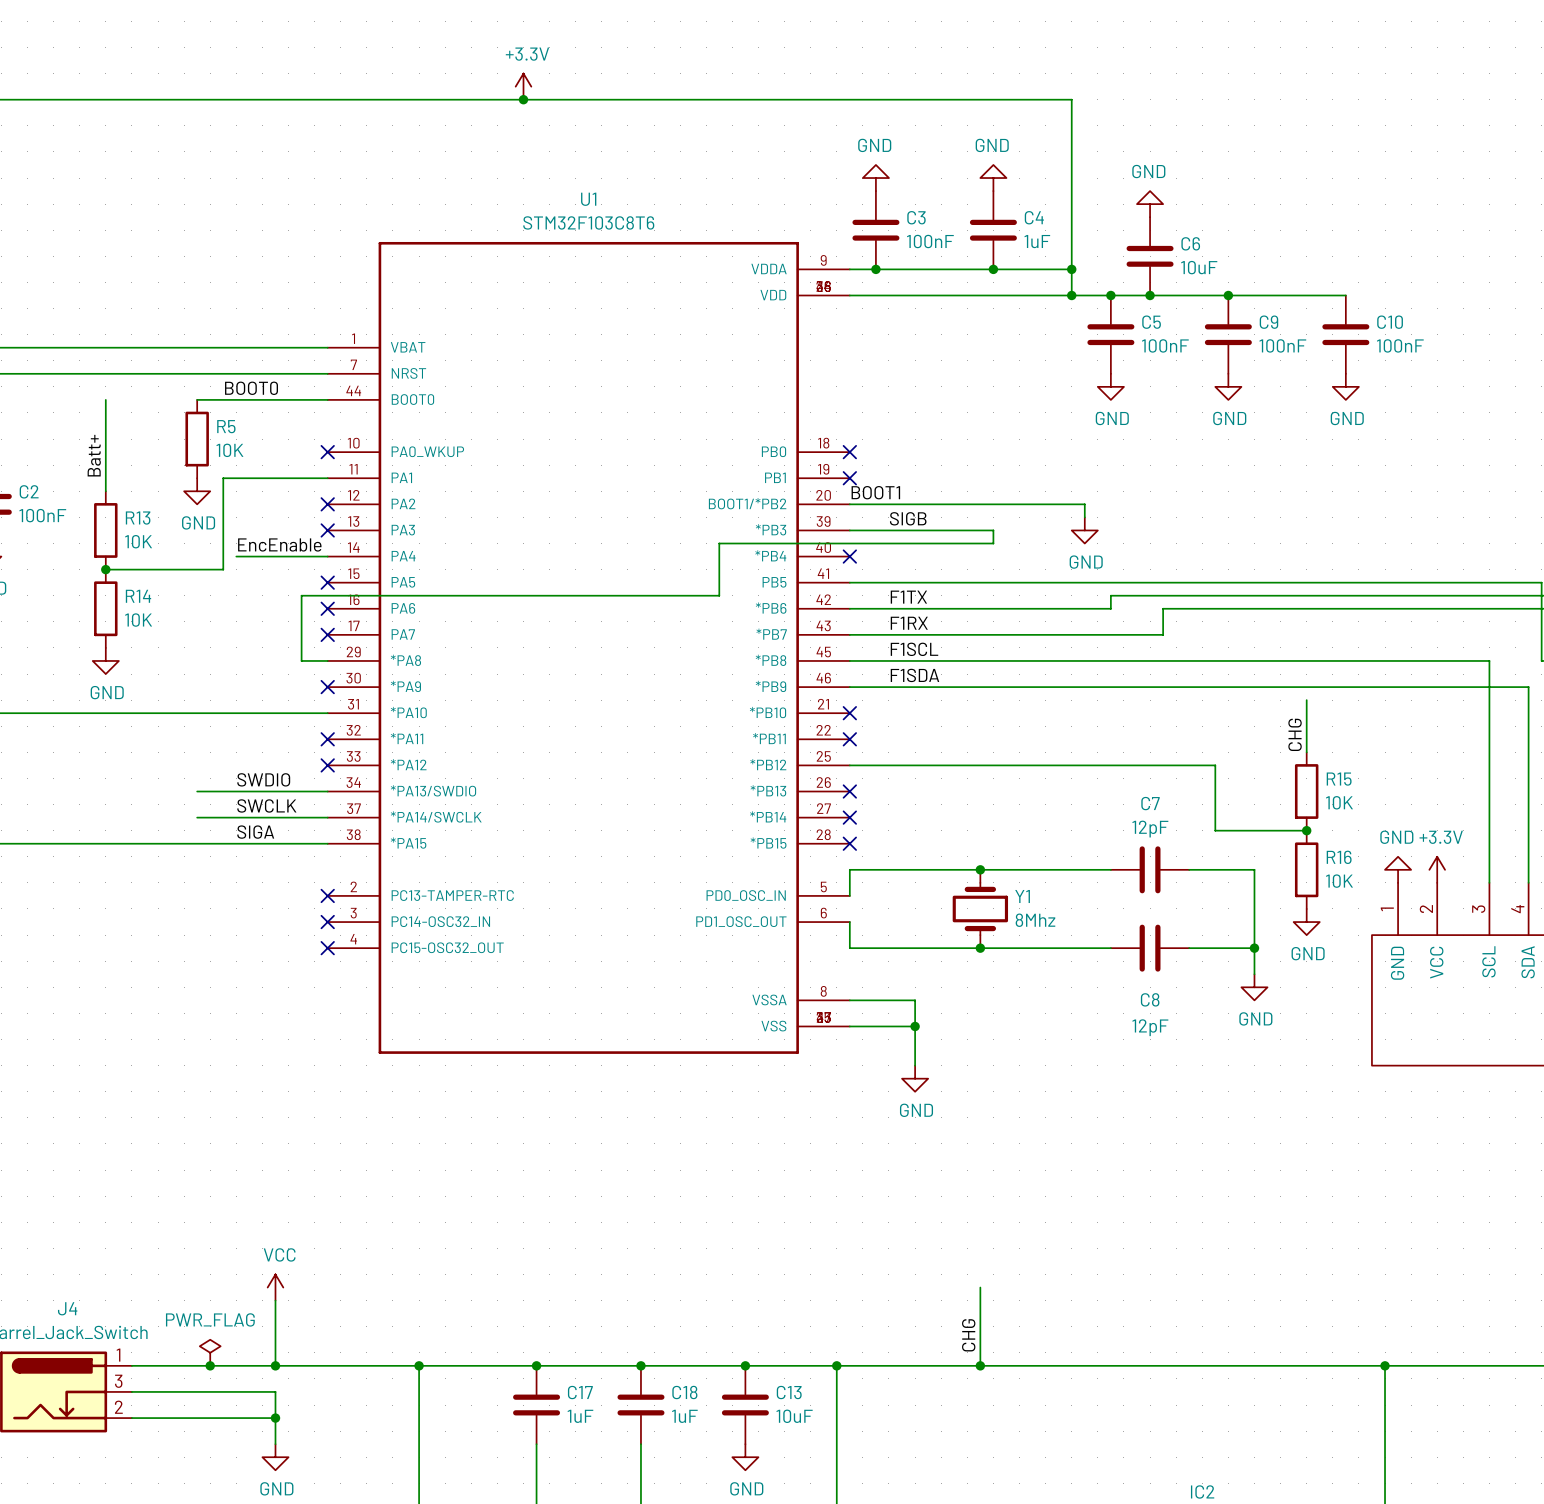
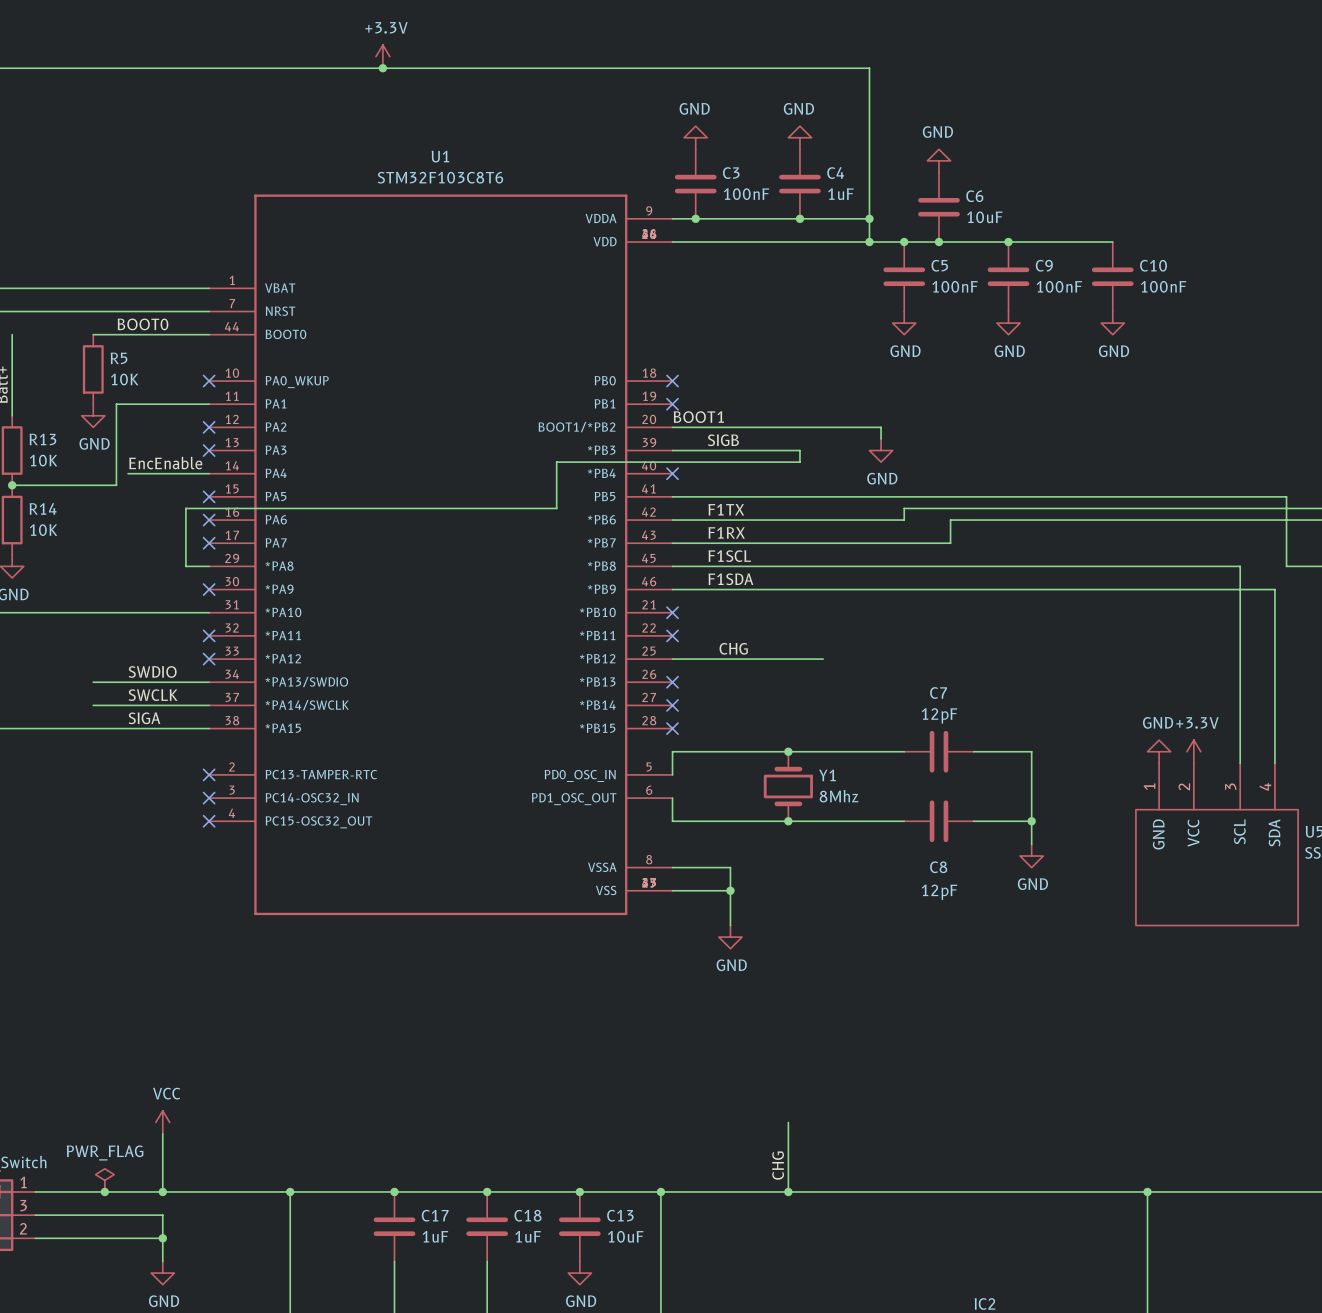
wire: (1306, 700) (1306, 752) -> none
label: CHG (1295, 734) -> none
label: none -> CHG (733, 648)
wire: (1019, 765) (1215, 765) (1215, 830) (1306, 830) -> none
R15: 10K (1306, 791) -> none
junction: (1306, 830) -> none
R16: 10K (1306, 869) -> none
power symbol: GND (1306, 922) -> none

